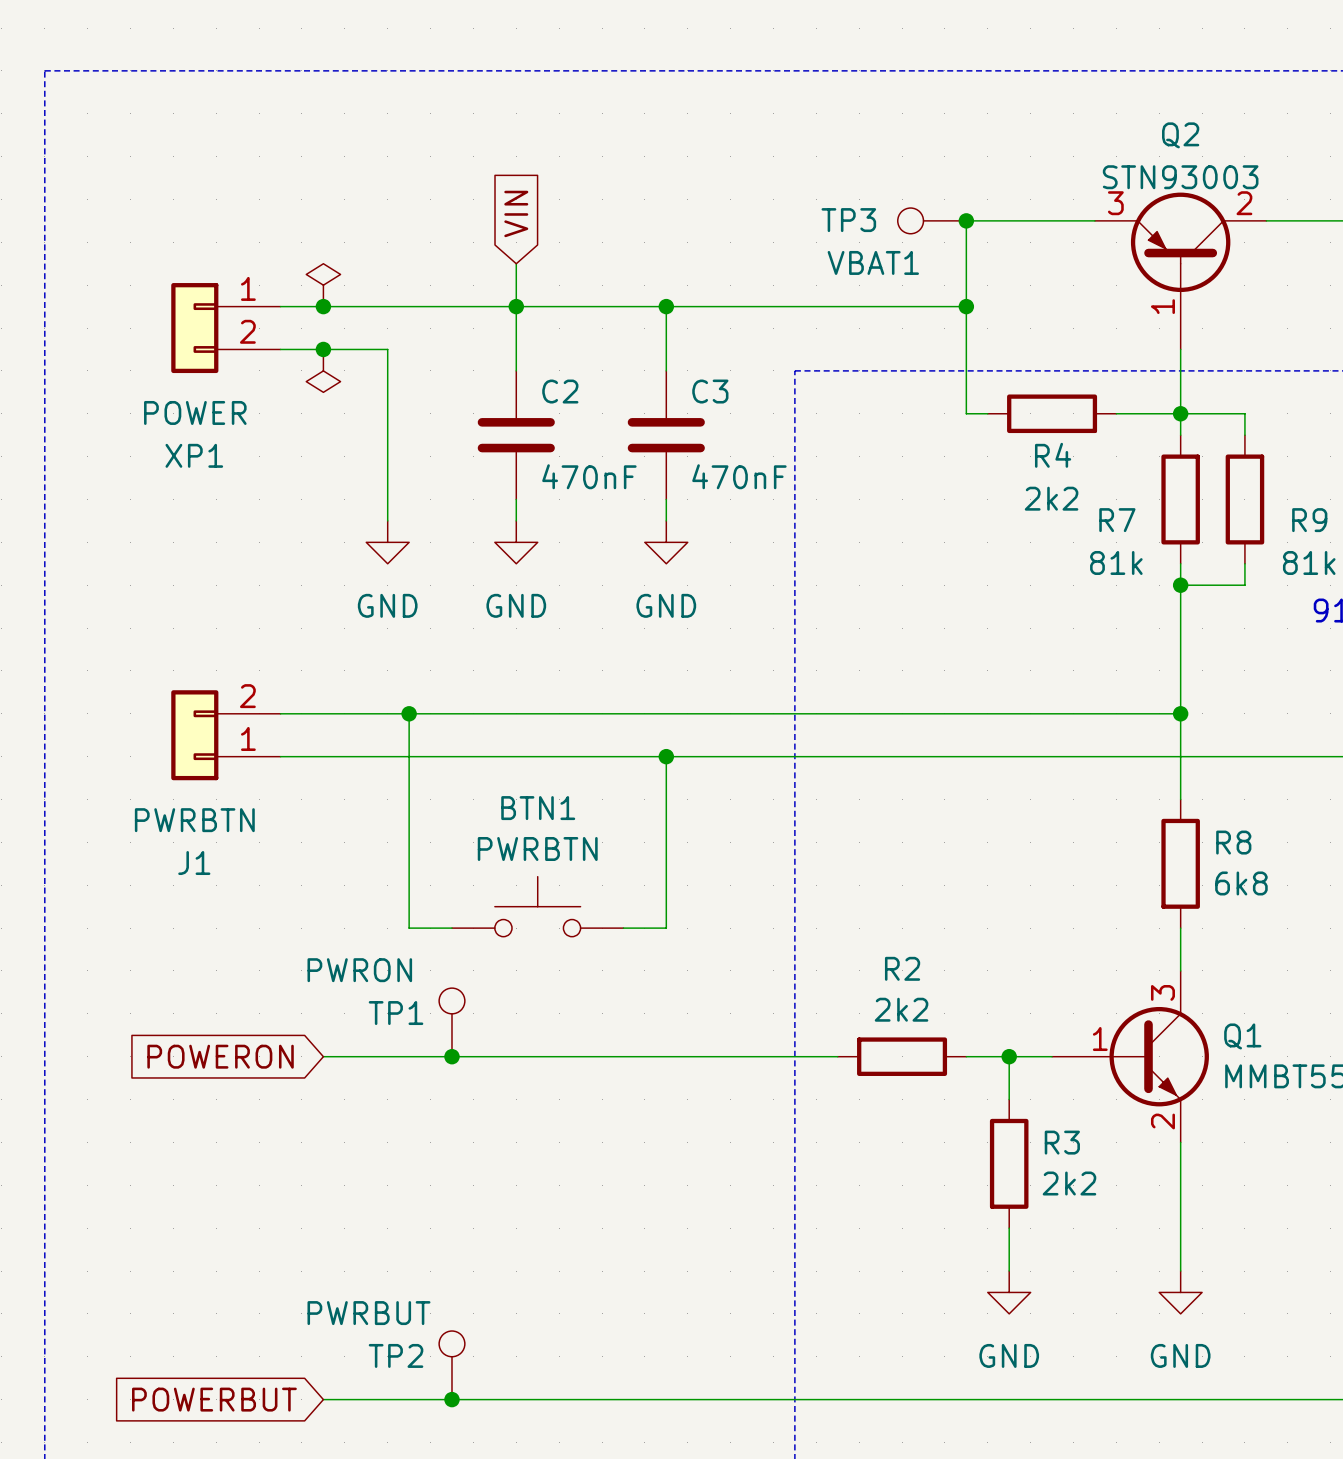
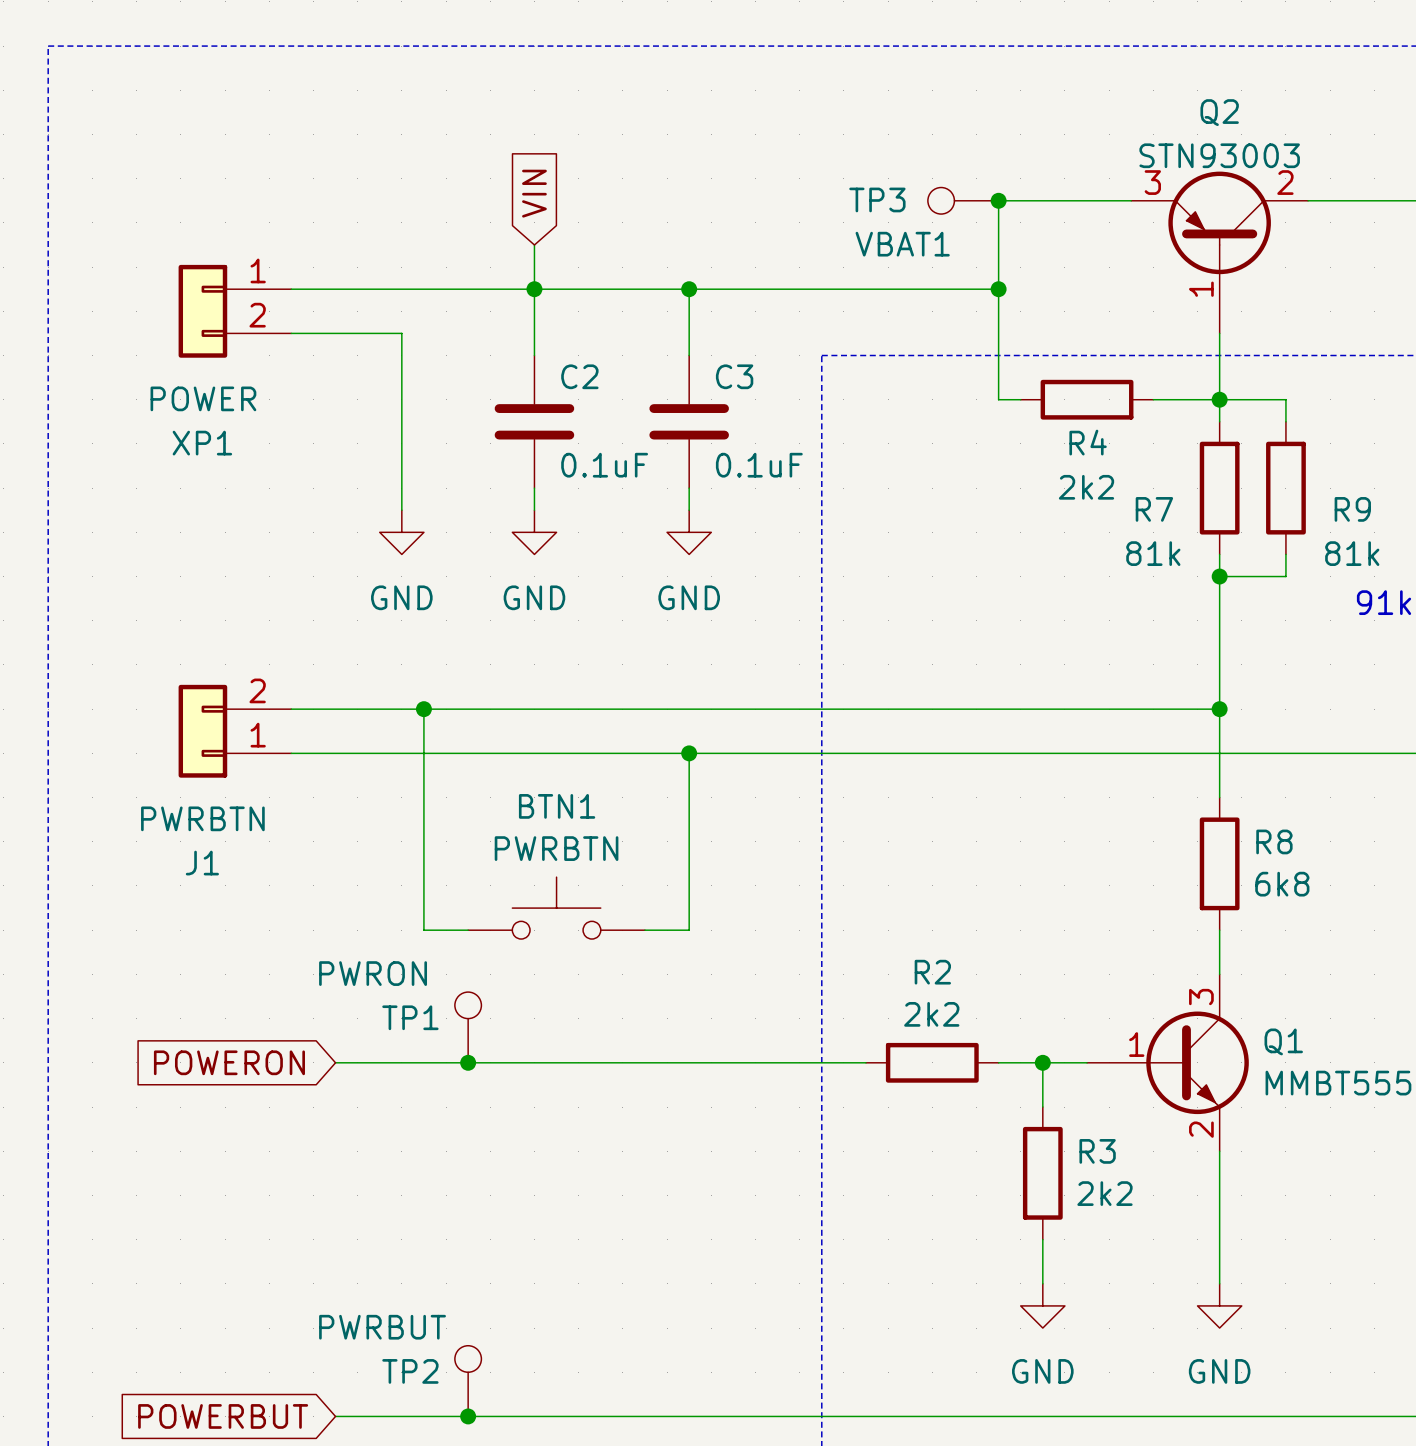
power symbol: (323, 285) -> none
junction: (323, 306) -> none
junction: (323, 349) -> none
power symbol: (323, 370) -> none
C2 value: 470nF (589, 476) -> 0.1uF (604, 465)
C3 value: 470nF (739, 476) -> 0.1uF (759, 465)

